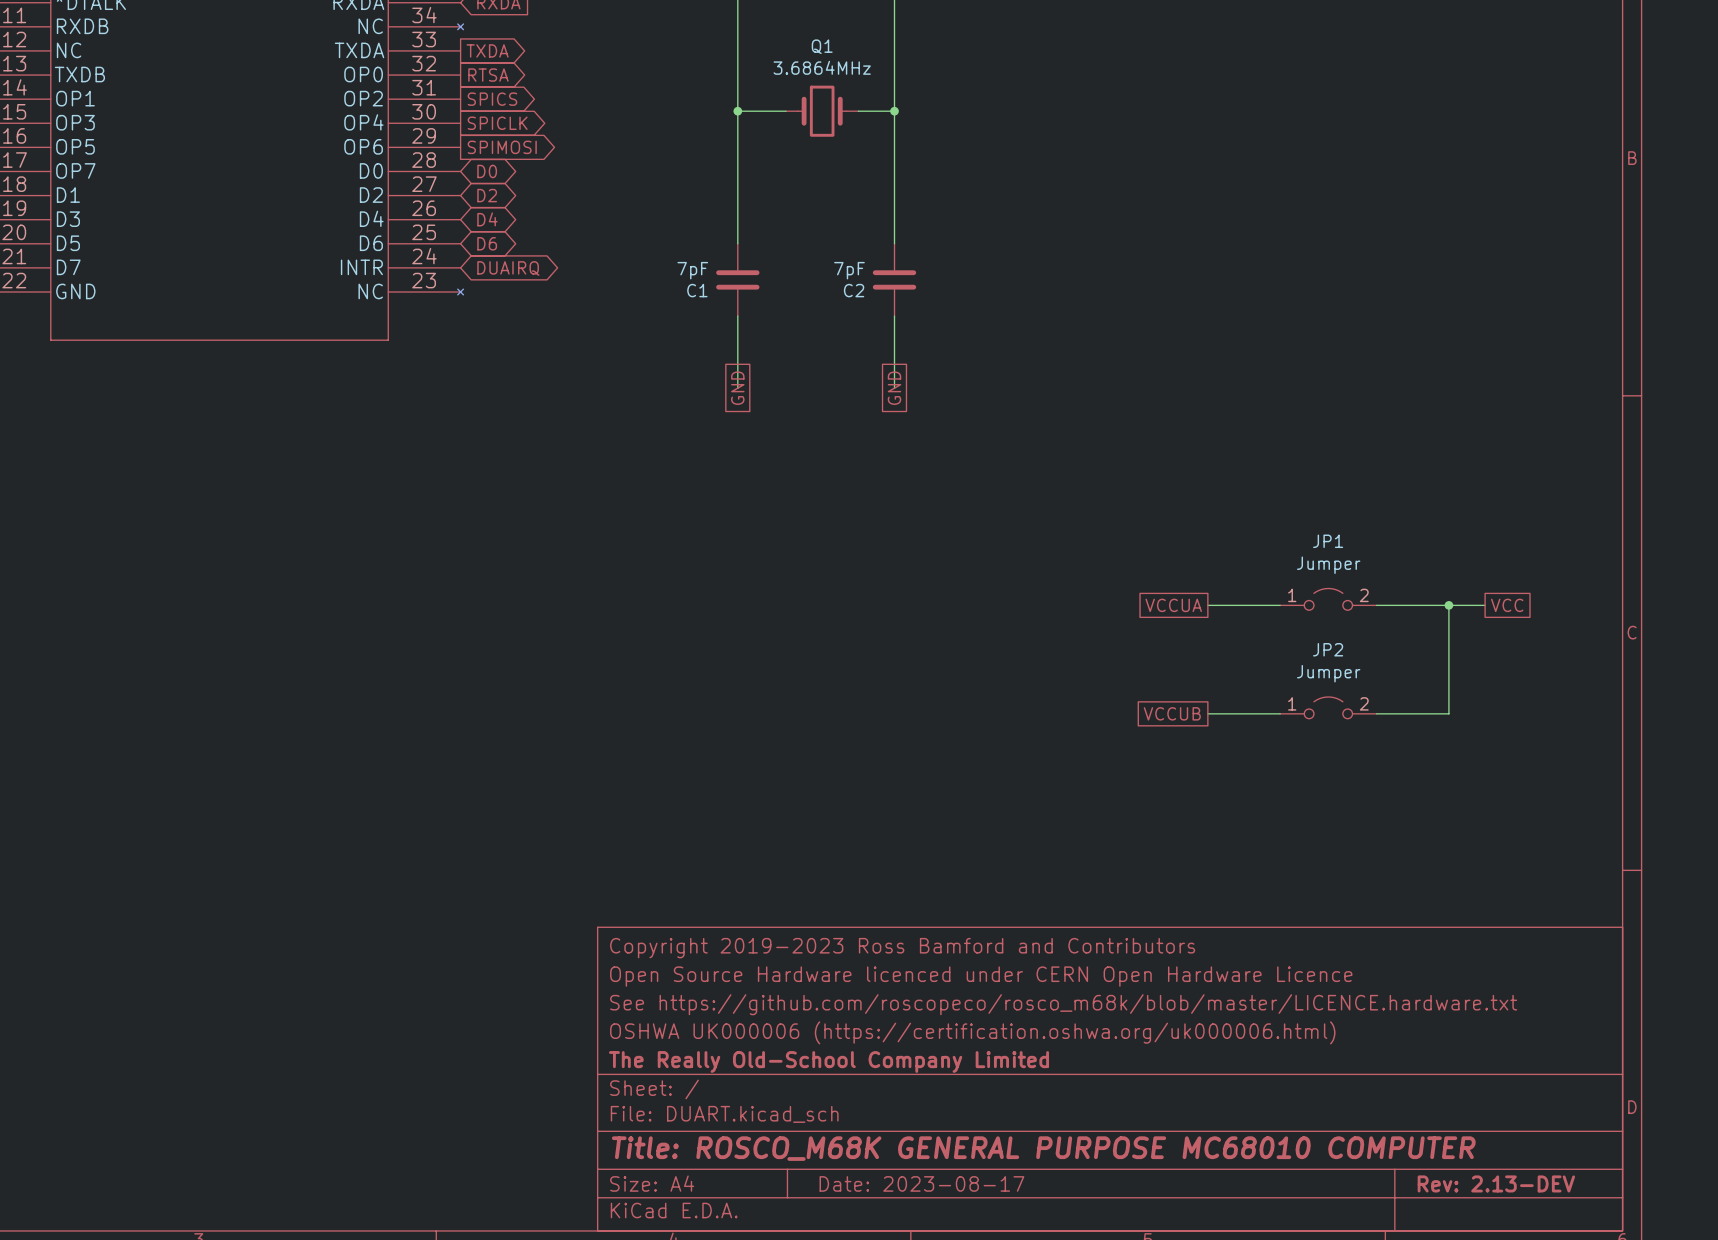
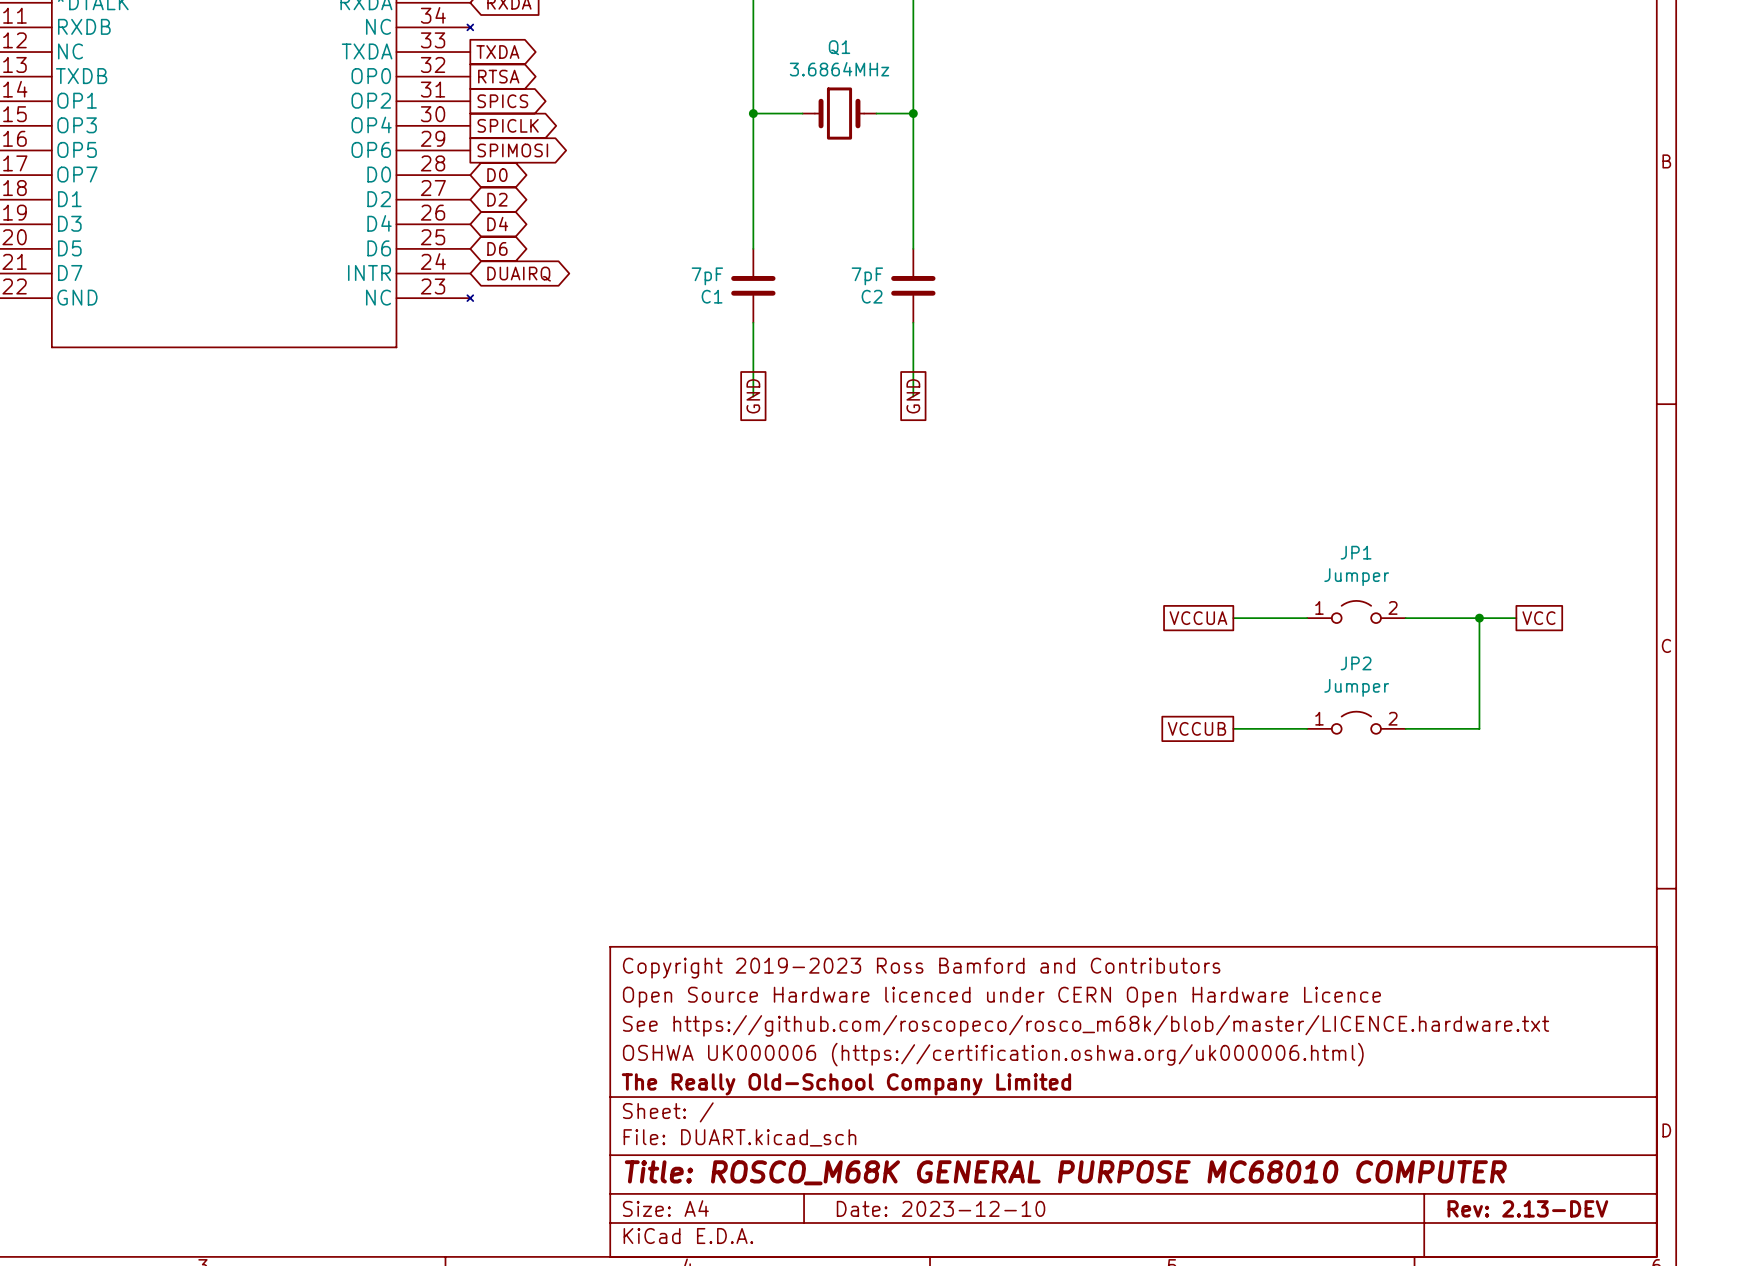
title block: Date: 2023-08-17 (921, 1183) -> Date: 2023-12-10 (941, 1208)

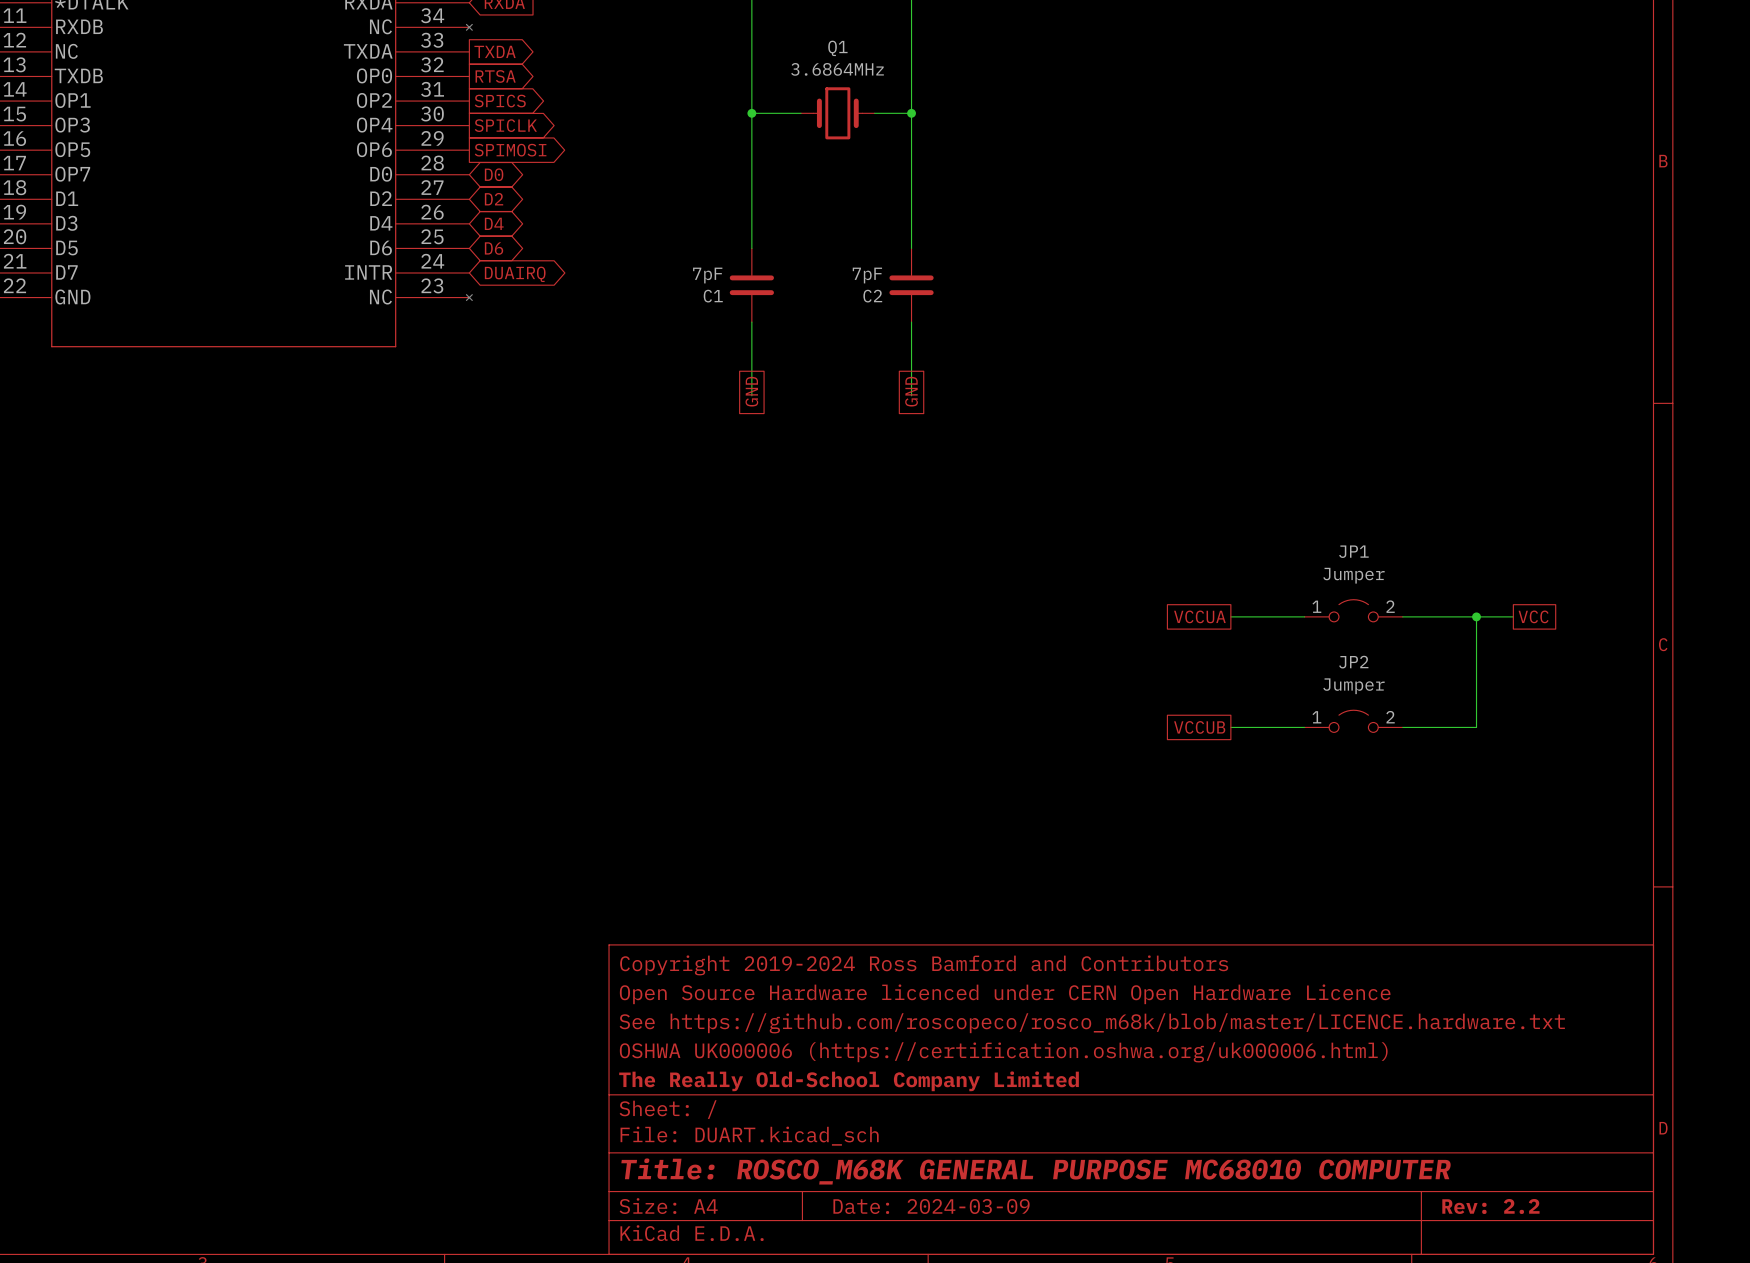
title block: Copyright 2019-2023 Ross Bamford and Contributors (921, 968) -> Copyright 2019-2024 Ross Bamford and Contributors (924, 965)
title block: Date: 2023-12-10 (941, 1208) -> Date: 2024-03-09 (931, 1206)
title block: Rev: 2.13-DEV (1527, 1208) -> Rev: 2.2 (1490, 1206)

